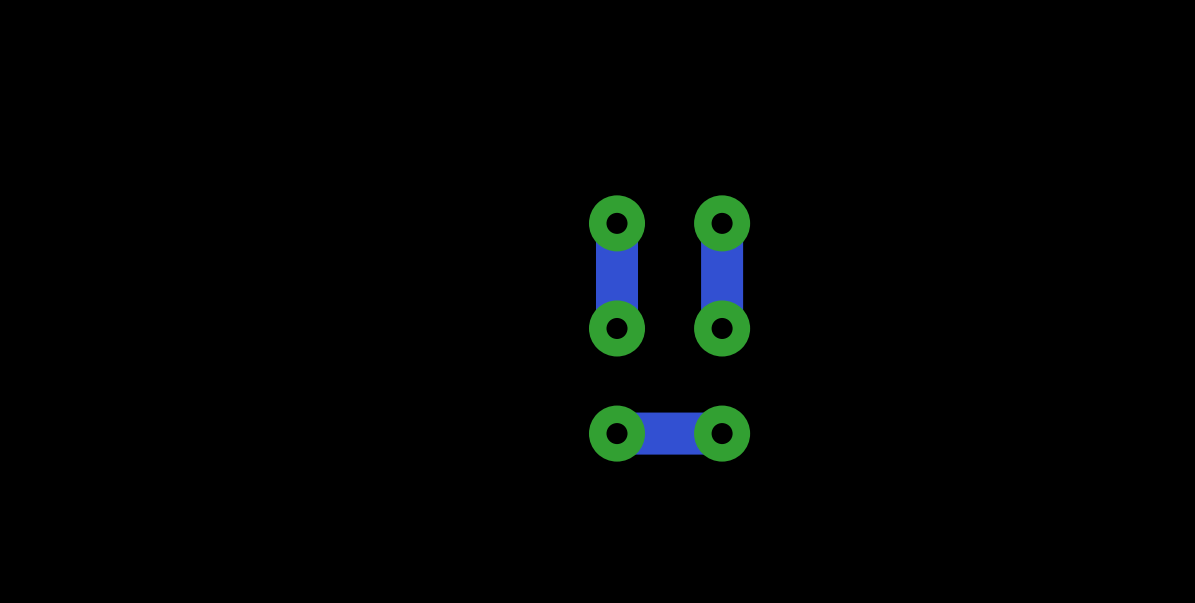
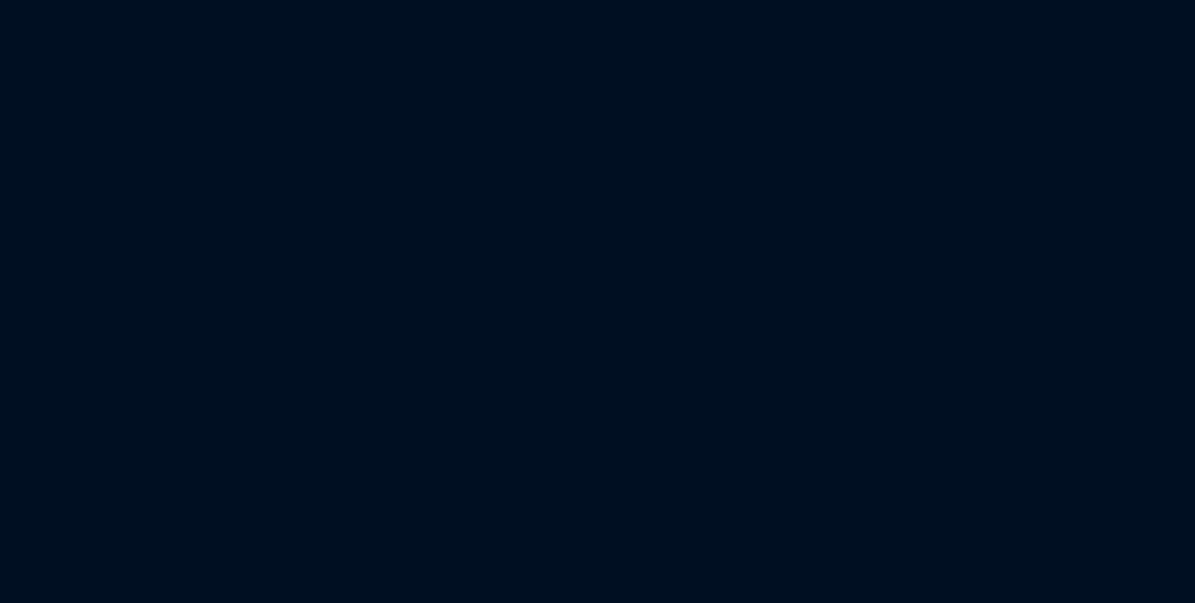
track: (617, 223) (617, 328) -> none
via: (617, 223) -> none
track: (722, 223) (722, 328) -> none
via: (722, 223) -> none
via: (617, 328) -> none
via: (722, 328) -> none
via: (617, 433) -> none
track: (722, 433) (617, 433) -> none
via: (722, 433) -> none

